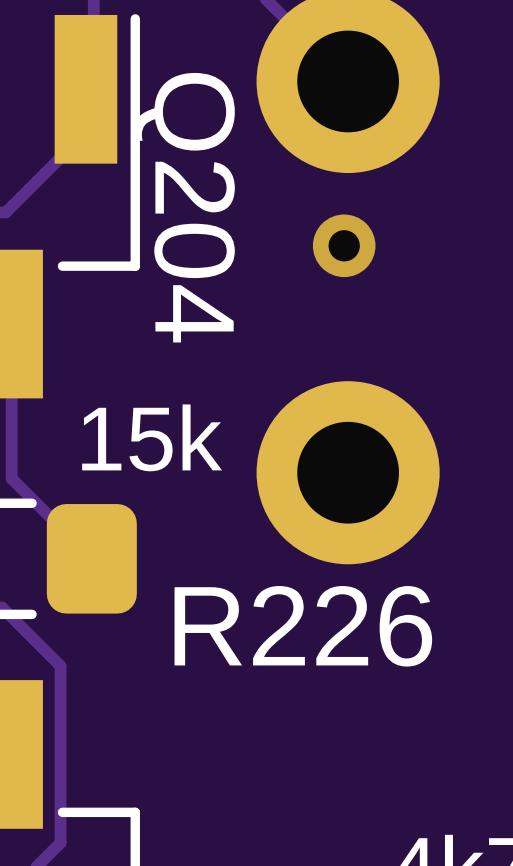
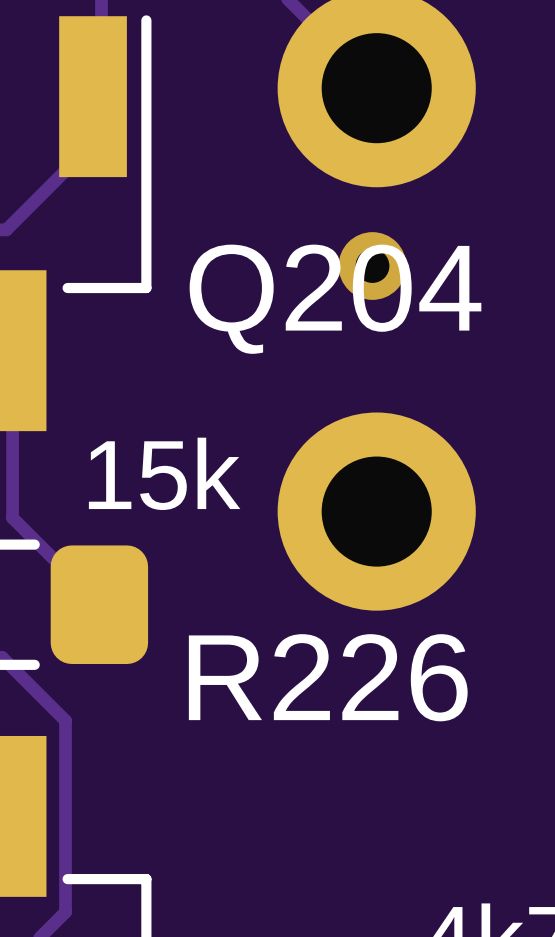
Q204 name rotation: 0° (184, 207) -> 90° counterclockwise (335, 299)

